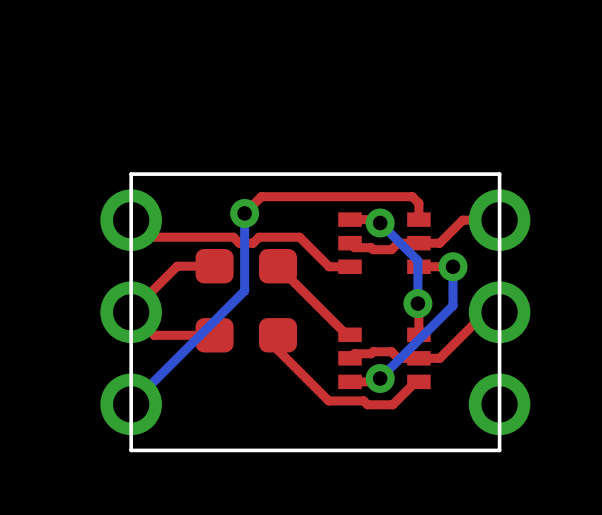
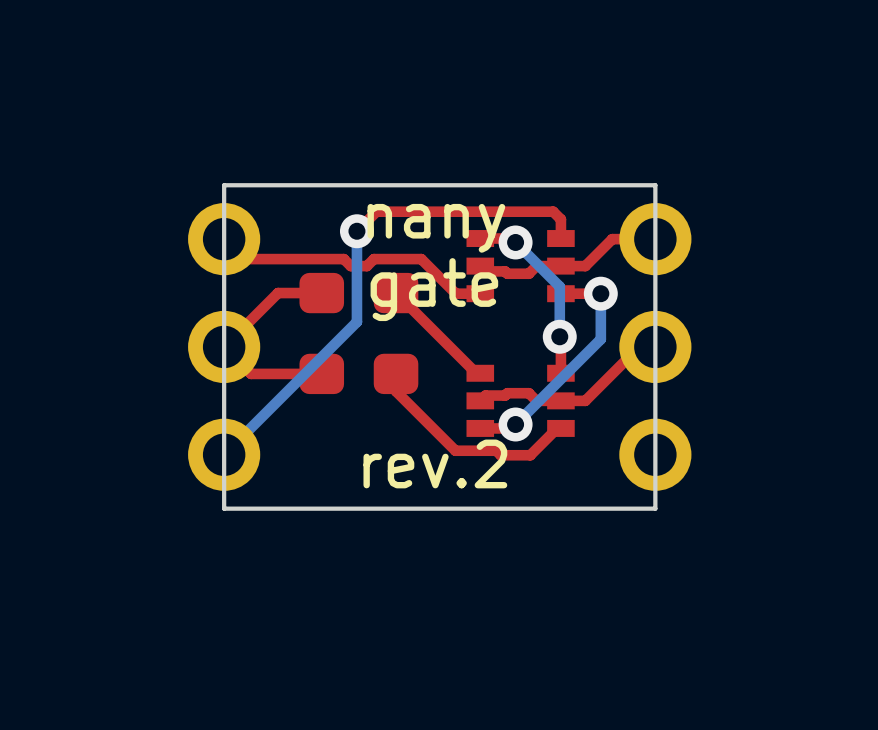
text: none -> nany (436, 228)
text: none -> gate (434, 289)
text: none -> rev.2 (435, 463)

